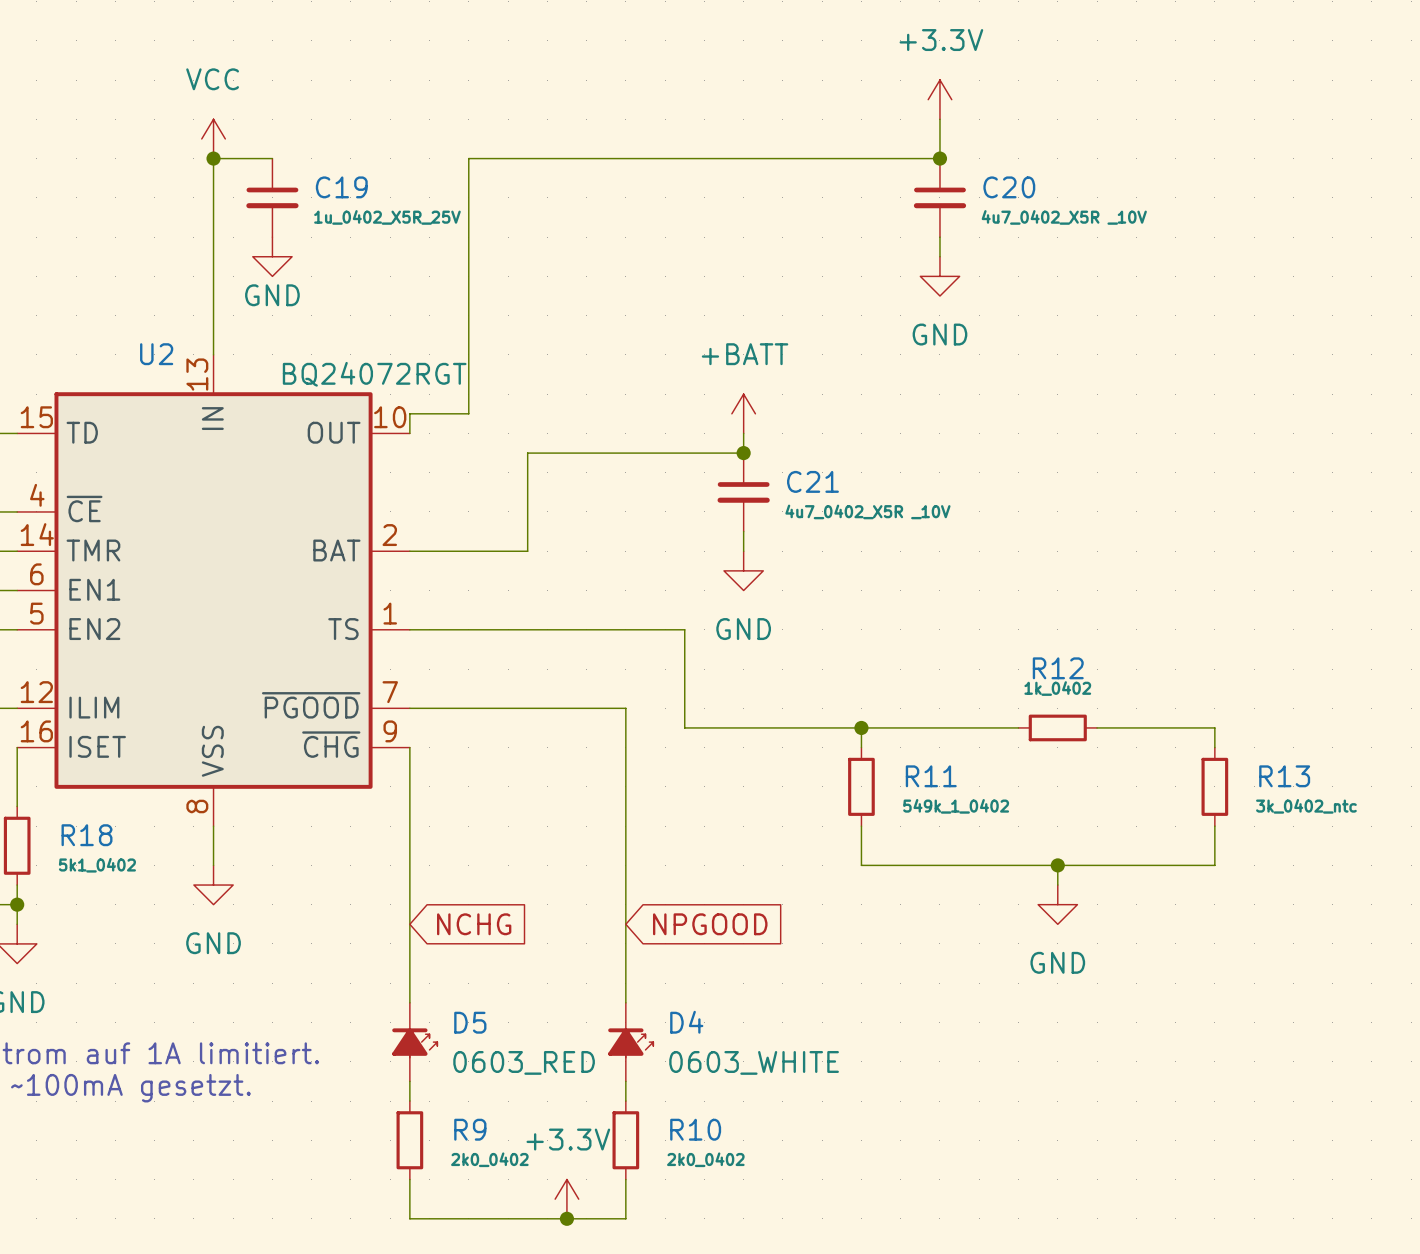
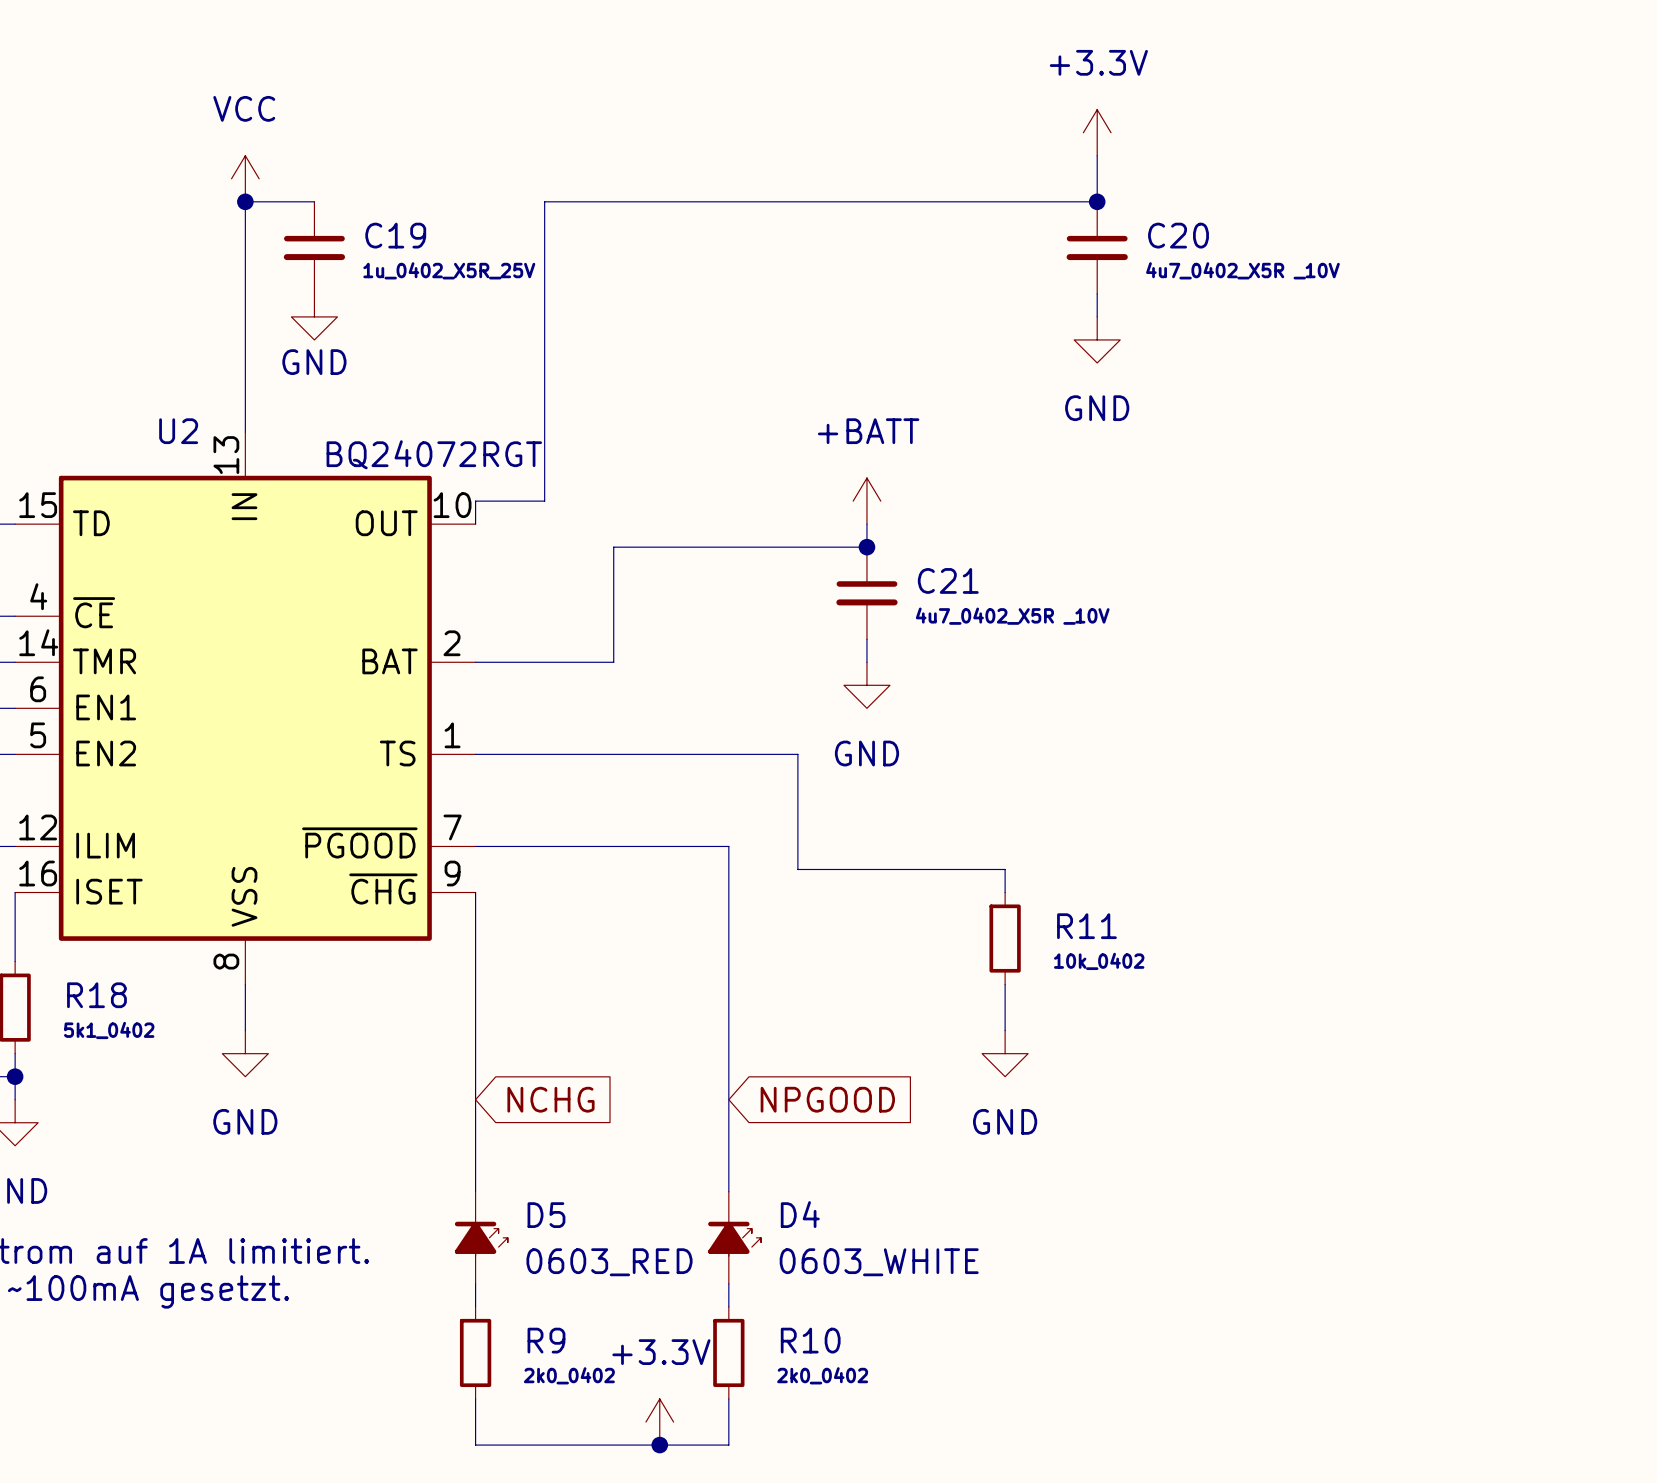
wire: (861, 727) (1018, 727) -> none
junction: (861, 727) -> none
R12: 1k_0402 (1057, 727) -> none
wire: (1097, 727) (1214, 727) (1214, 747) -> none
R13: 3k_0402_ntc (1214, 786) -> none
R11 value: 549k_1_0402 (956, 806) -> 10k_0402 (1099, 961)
wire: (1214, 826) (1214, 865) (861, 865) -> none
wire: (1057, 865) (1057, 885) -> none
junction: (1057, 865) -> none
power symbol position: GND (1057, 904) -> GND (1005, 1053)

